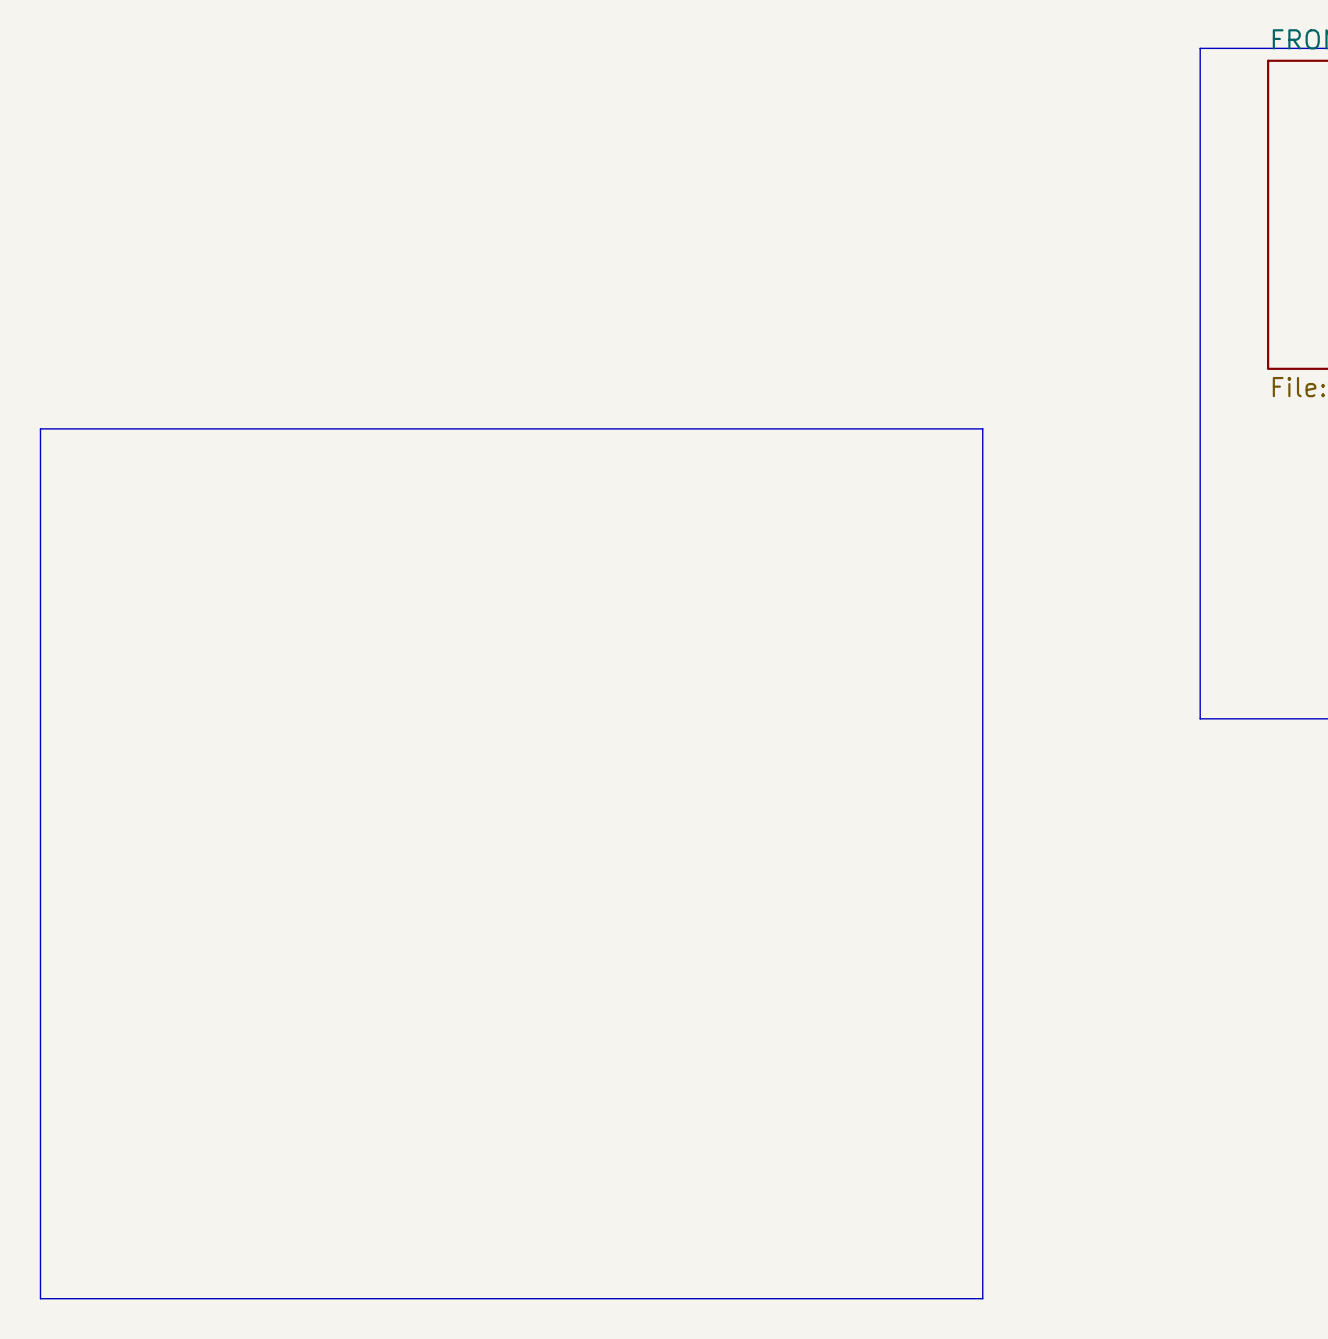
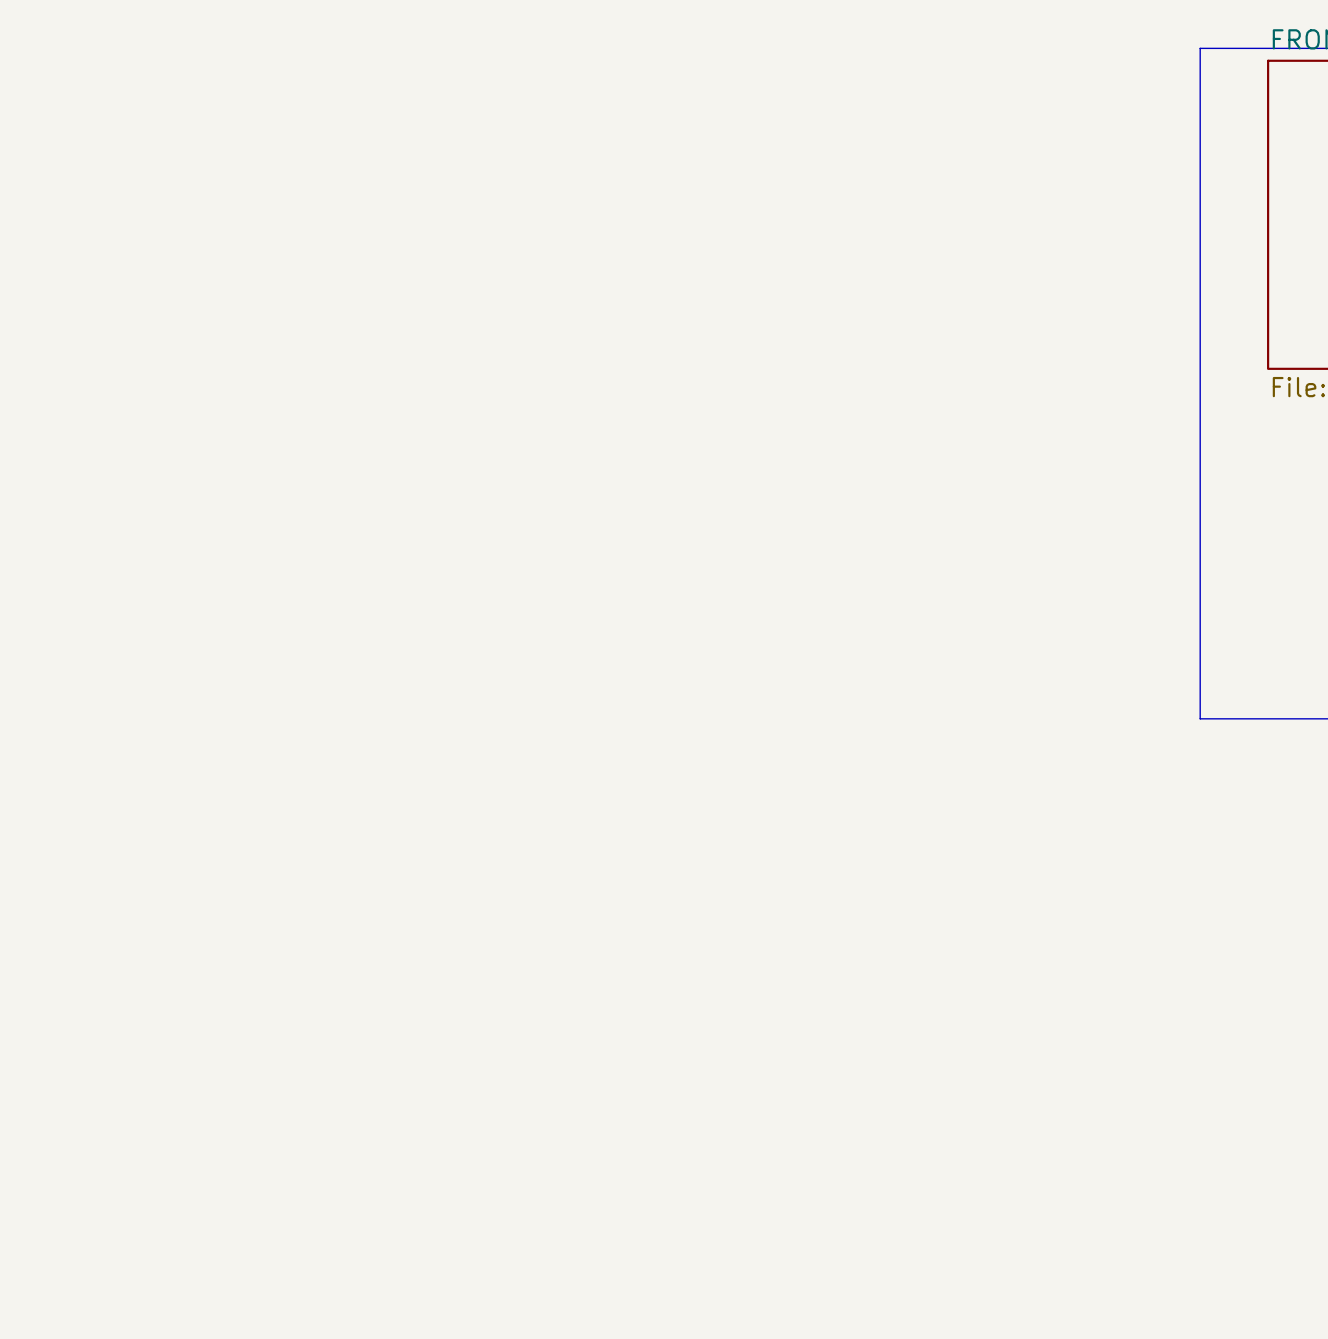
line: (40, 428) (982, 428) (982, 1298) (40, 1298) (40, 428) -> none

